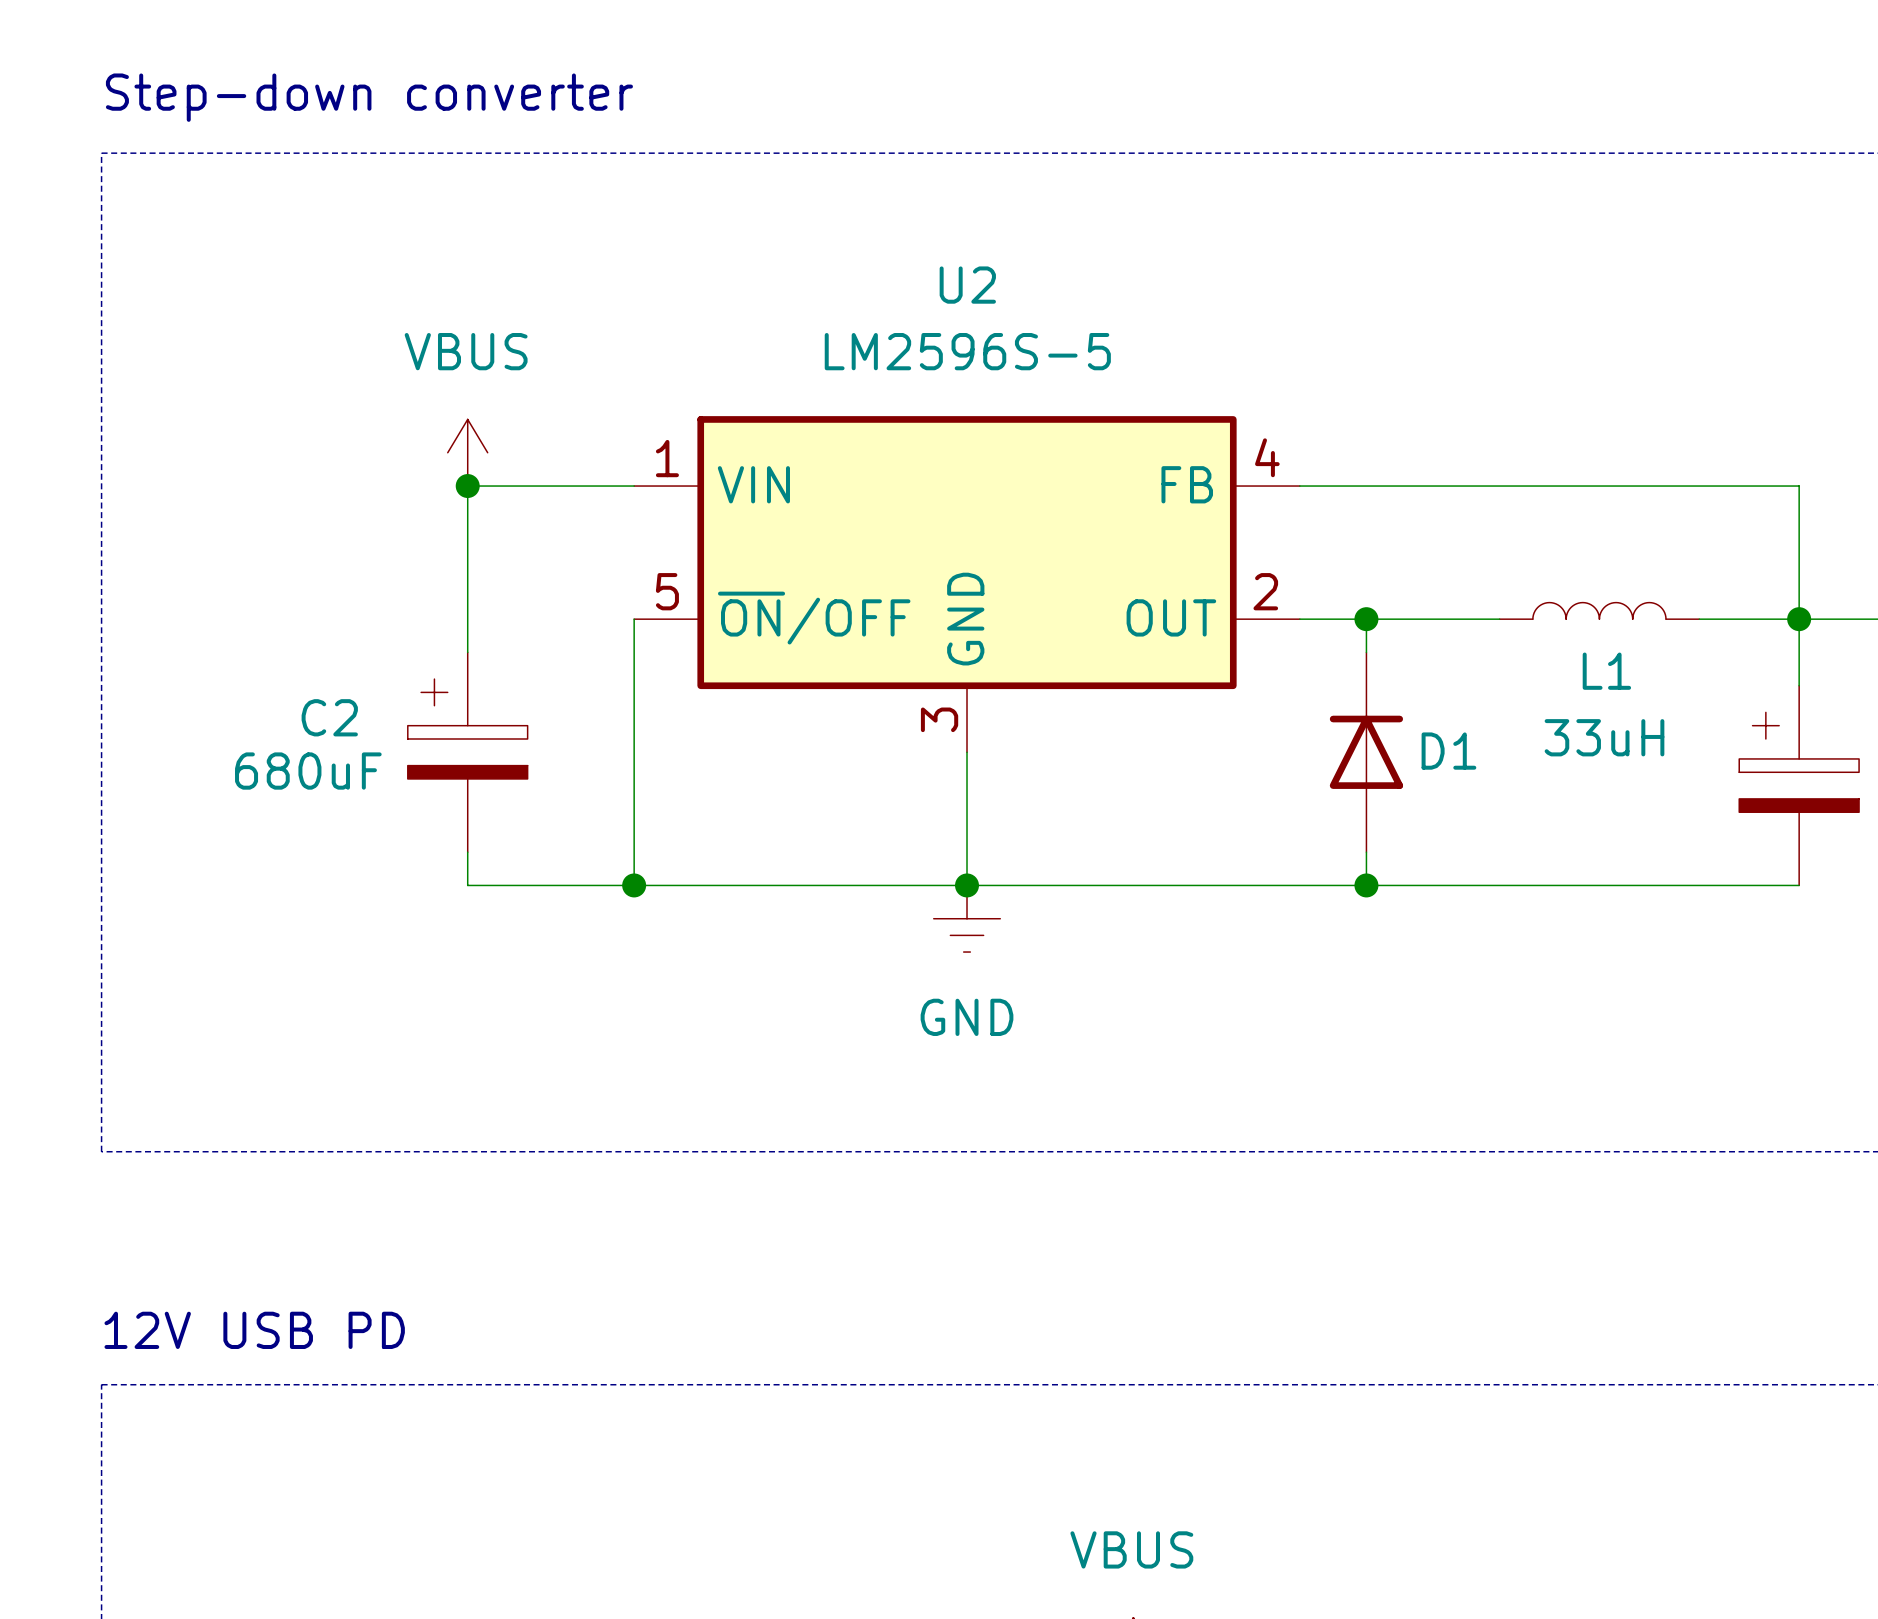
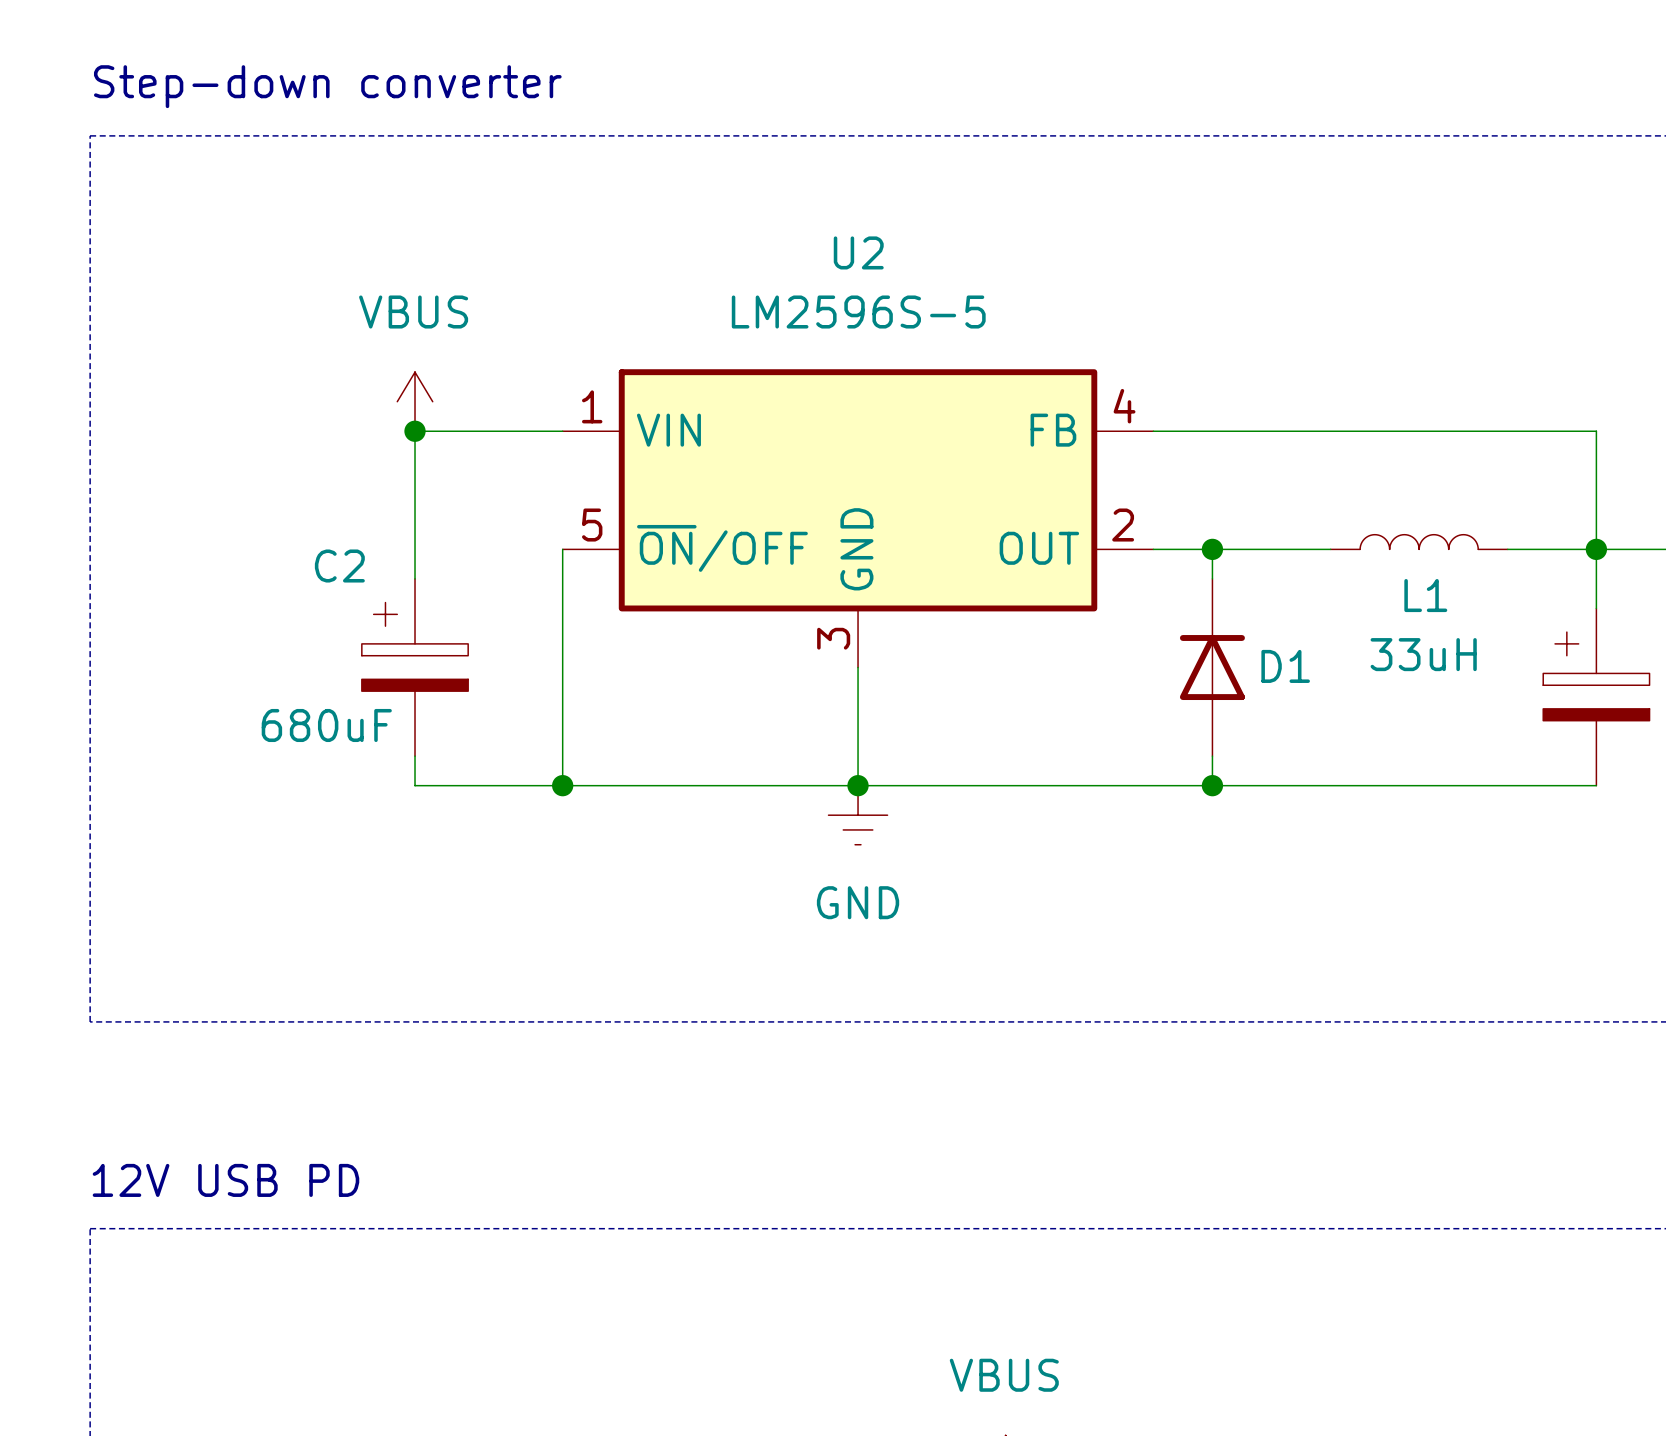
C2 name position: C2 (329, 717) -> C2 (339, 566)
C2 value position: 680uF (308, 771) -> 680uF (326, 725)

